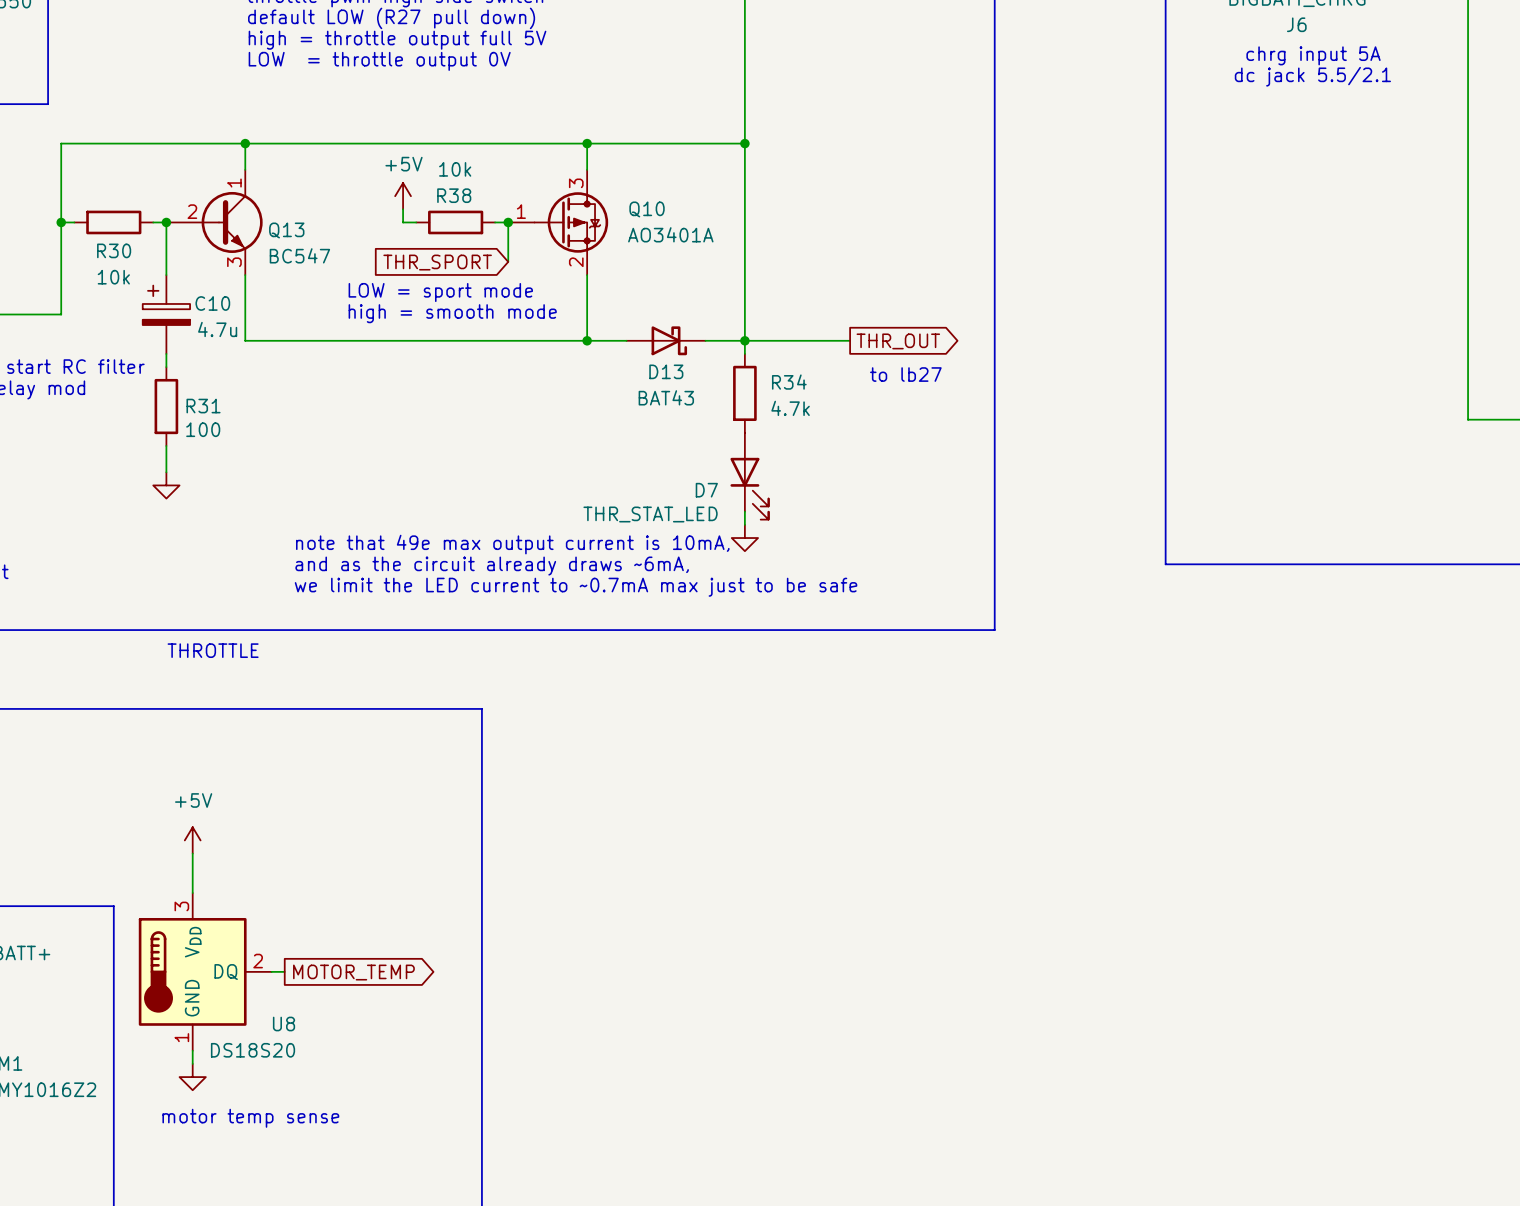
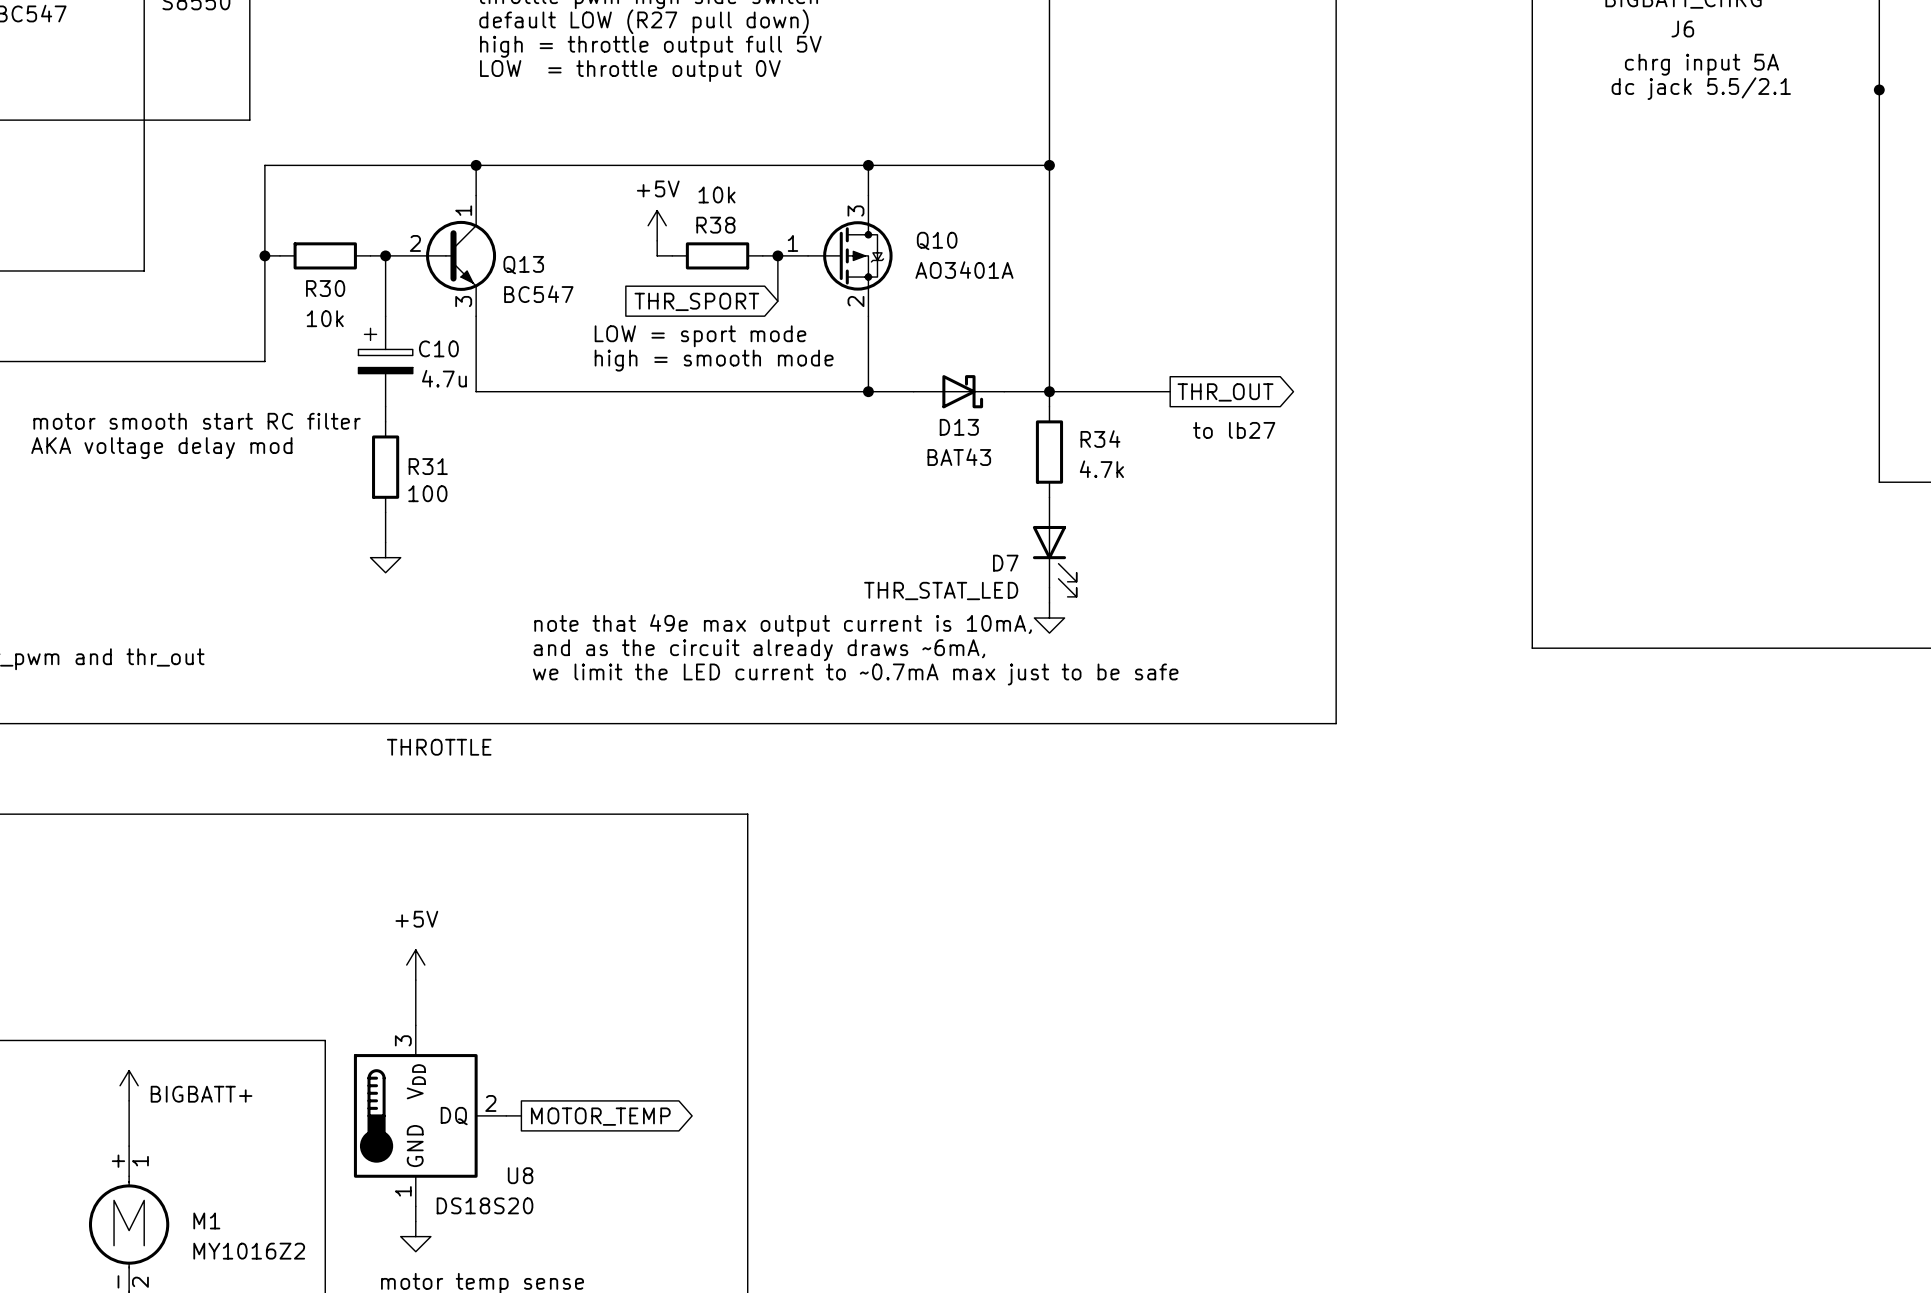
junction: none -> (1879, 89)

